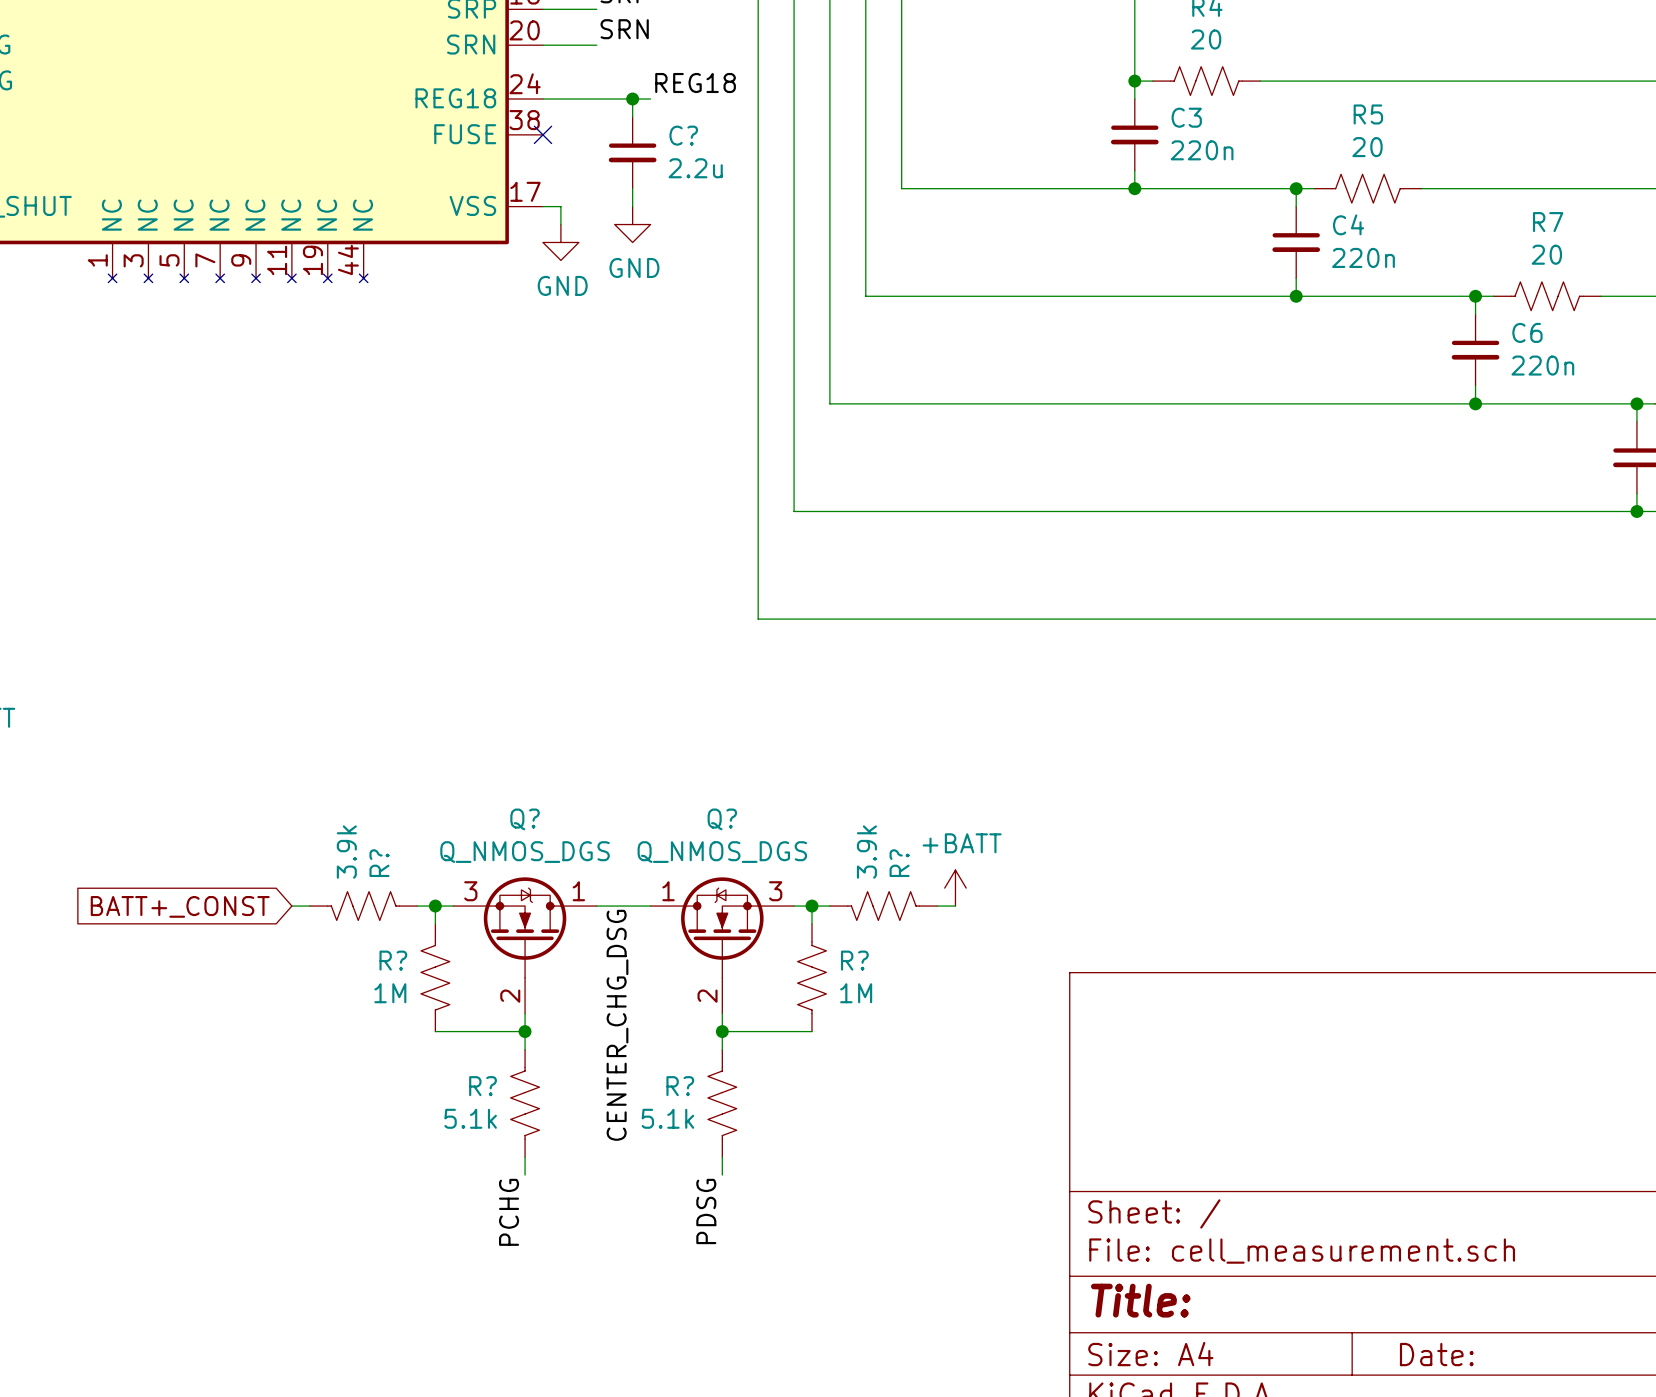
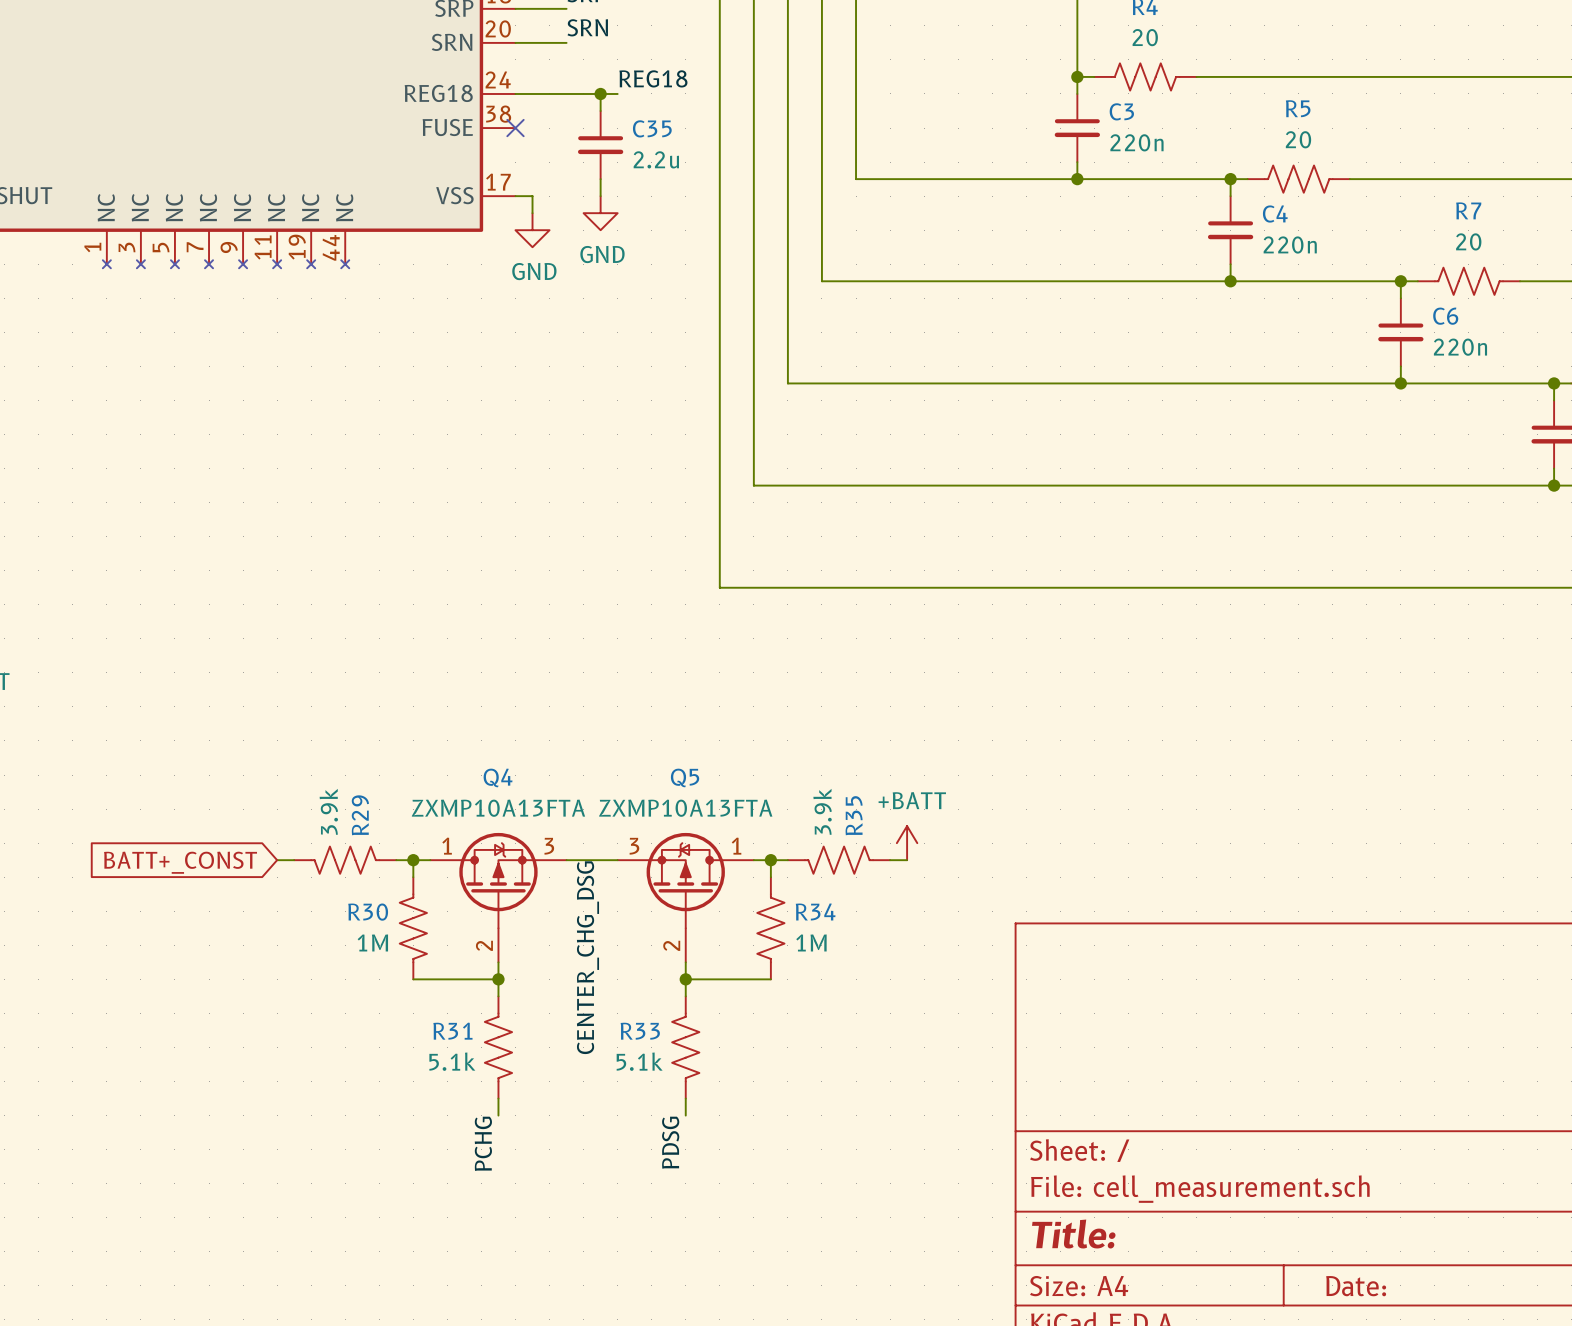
C? name: C? (683, 135) -> C35 (652, 128)
R? name: R? (379, 863) -> R29 (360, 815)
R? name: R? (899, 863) -> R35 (854, 815)
Q?: Q_NMOS_DGS (525, 945) -> none
Q4: none -> ZXMP10A13FTA (498, 897)
Q?: Q_NMOS_DGS (722, 945) -> none
Q5: none -> ZXMP10A13FTA (685, 897)
R? name: R? (393, 960) -> R30 (368, 912)
R? name: R? (854, 960) -> R34 (815, 911)
R? name: R? (483, 1086) -> R31 (452, 1031)
R? name: R? (680, 1086) -> R33 (640, 1031)

